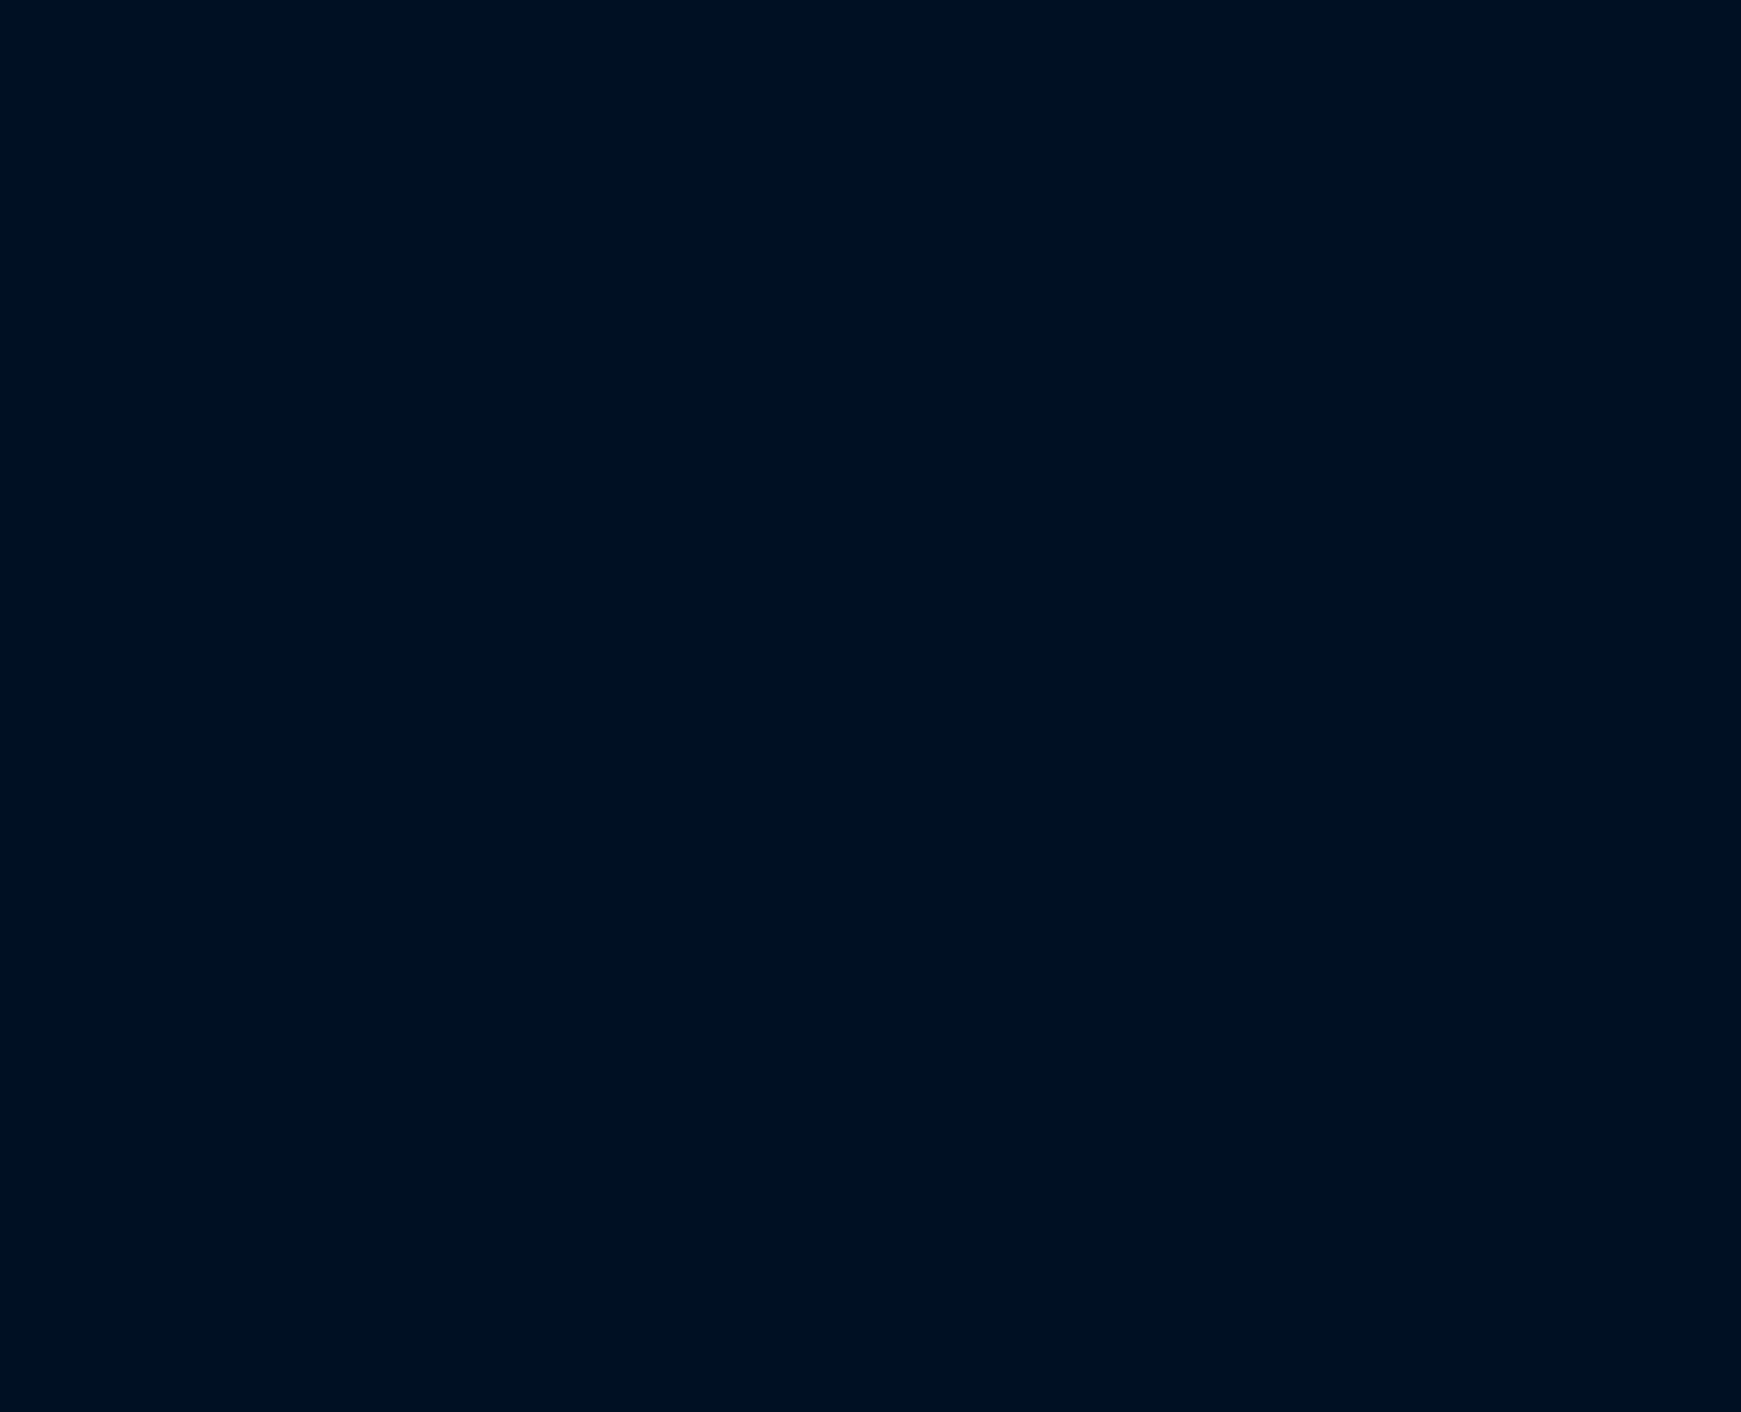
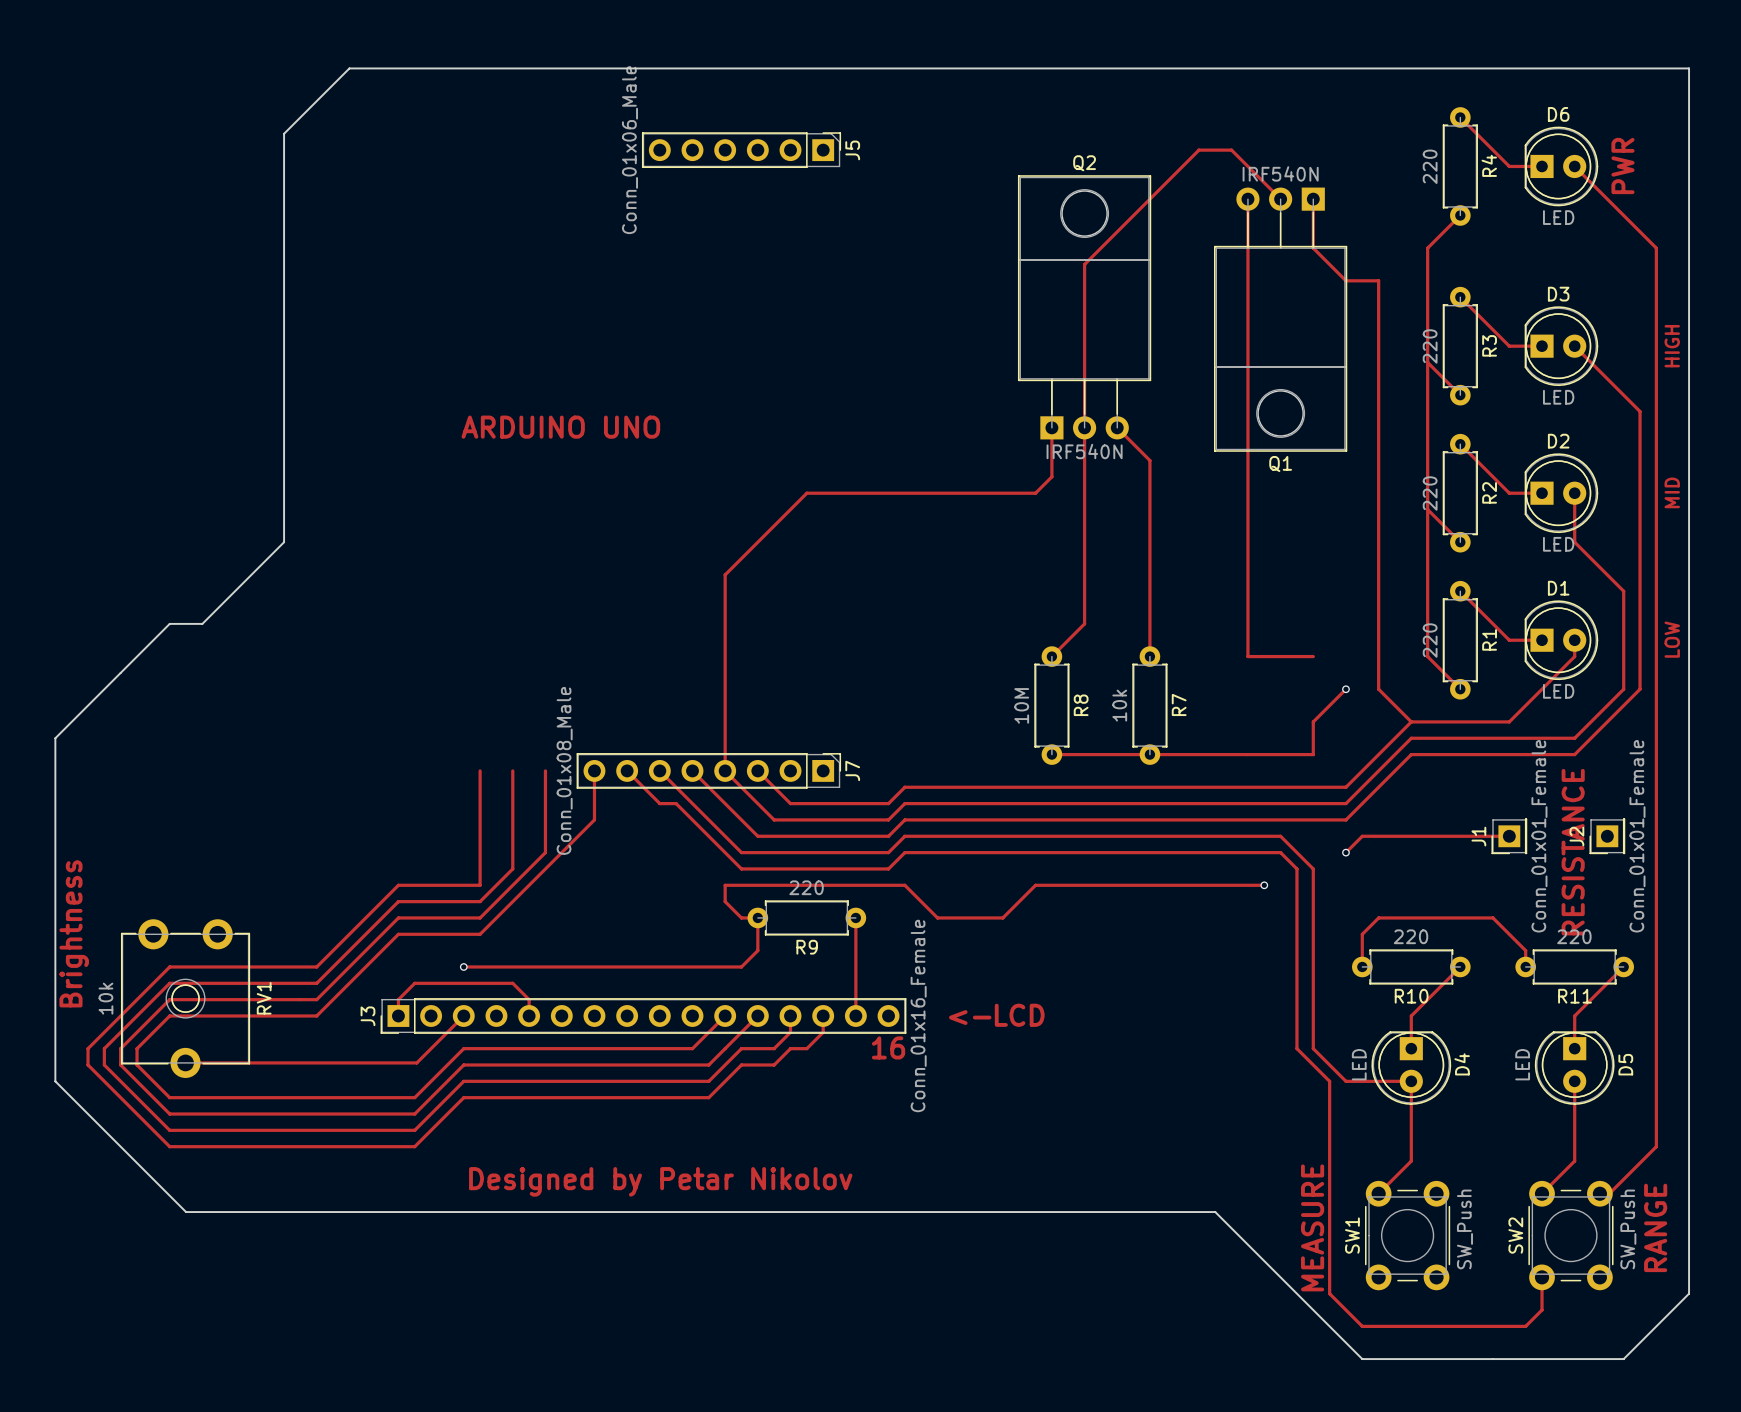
board edge: none -> (349, 68) (1689, 68) (1689, 1293) (1623, 1359) (1362, 1359) (1215, 1212) (186, 1212) (55, 1081) (55, 738) (169, 623) (202, 623) (284, 542) (284, 133) (349, 68)
track: none -> (1460, 117) (1509, 166) (1542, 166)
J5: none -> Conn_01x06_Male (741, 150)
text: none -> PWR (1622, 166)
R4: none -> 220 (1460, 166)
D6: none -> LED (1561, 166)
track: none -> (1574, 166) (1656, 248) (1656, 1146) (1609, 1193) (1599, 1193)
track: none -> (1247, 199) (1247, 656) (1313, 656)
track: none -> (1280, 199) (1231, 150) (1198, 150) (1084, 264) (1084, 623) (1051, 656)
track: none -> (1313, 199) (1313, 248) (1345, 280) (1378, 280) (1378, 689) (1411, 721)
track: none -> (1460, 215) (1427, 248) (1427, 656) (1460, 689)
track: none -> (1460, 297) (1509, 346) (1542, 346)
Q2: none -> IRF540N (1084, 307)
Q1: none -> IRF540N (1280, 319)
R3: none -> 220 (1460, 346)
D3: none -> LED (1561, 346)
track: none -> (1574, 346) (1640, 411) (1640, 689) (1574, 754) (1411, 754) (1345, 819) (904, 819) (888, 836) (757, 836) (692, 770)
text: none -> HIGH (1672, 346)
track: none -> (1427, 362) (1460, 395)
text: none -> ARDUINO UNO (560, 427)
track: none -> (1051, 427) (1051, 476) (1035, 493) (806, 493) (725, 574) (725, 770) (774, 819) (888, 819) (904, 803) (1345, 803) (1411, 738) (1574, 738) (1623, 689) (1623, 591) (1574, 542) (1574, 493)
track: none -> (1117, 427) (1149, 460) (1149, 656)
track: none -> (1460, 444) (1509, 493) (1542, 493)
R2: none -> 220 (1460, 493)
D2: none -> LED (1561, 493)
text: none -> MID (1672, 492)
track: none -> (1427, 509) (1460, 542)
track: none -> (1460, 591) (1509, 640) (1542, 640)
text: none -> LOW (1672, 639)
R1: none -> 220 (1460, 640)
D1: none -> LED (1561, 640)
track: none -> (1574, 640) (1574, 656) (1509, 721) (1411, 721)
track: none -> (1345, 689) (1313, 721) (1313, 754) (1051, 754)
via: none -> (1345, 689)
R8: none -> 10M (1051, 705)
R7: none -> 10k (1149, 705)
track: none -> (1411, 721) (1345, 787) (904, 787) (888, 803) (790, 803) (757, 770)
track: none -> (480, 770) (480, 885) (398, 885) (316, 966) (169, 966) (88, 1048) (88, 1065) (169, 1146) (414, 1146) (463, 1097) (708, 1097) (741, 1065) (774, 1065) (790, 1048) (806, 1048) (823, 1032) (823, 1015)
track: none -> (512, 770) (512, 868) (480, 901) (398, 901) (316, 983) (169, 983) (104, 1048) (104, 1065) (169, 1130) (414, 1130) (463, 1081) (708, 1081) (741, 1048) (774, 1048) (790, 1032) (790, 1015)
track: none -> (545, 770) (545, 852) (480, 917) (398, 917) (316, 999) (169, 999) (120, 1048) (120, 1065) (169, 1114) (414, 1114) (463, 1065) (708, 1065) (757, 1015)
track: none -> (594, 770) (594, 819) (480, 934) (398, 934) (316, 1015) (169, 1015) (137, 1048) (137, 1065) (169, 1097) (414, 1097) (463, 1048) (692, 1048) (725, 1015)
track: none -> (627, 770) (659, 803) (676, 803) (741, 868) (888, 868) (904, 852) (1280, 852) (1296, 868) (1296, 1048) (1329, 1081) (1329, 1293) (1362, 1326) (1525, 1326) (1542, 1310) (1542, 1277)
track: none -> (659, 770) (741, 852) (888, 852) (904, 836) (1280, 836) (1313, 868) (1313, 1048) (1345, 1081) (1411, 1081) (1411, 1161) (1378, 1193)
J7: none -> Conn_01x08_Male (708, 770)
track: none -> (1509, 836) (1362, 836) (1345, 852)
J1: none -> Conn_01x01_Female (1509, 836)
J2: none -> Conn_01x01_Female (1607, 836)
via: none -> (1345, 852)
text: none -> RESISTANCE (1573, 852)
track: none -> (1264, 885) (1035, 885) (1002, 917) (937, 917) (904, 885) (725, 885) (725, 901) (741, 917) (757, 917) (757, 950) (741, 966) (463, 966)
via: none -> (1264, 885)
R9: none -> 220 (806, 917)
track: none -> (855, 917) (855, 1015)
text: none -> Brightness (74, 933)
via: none -> (463, 966)
track: none -> (1362, 966) (1362, 934) (1378, 917) (1493, 917) (1525, 950) (1525, 966)
R10: none -> 220 (1411, 966)
track: none -> (1460, 966) (1411, 1015) (1411, 1048)
R11: none -> 220 (1574, 966)
track: none -> (1623, 966) (1574, 1015) (1574, 1048)
RV1: none -> 10k (185, 998)
track: none -> (398, 1015) (398, 999) (414, 983) (512, 983) (529, 999) (529, 1015)
track: none -> (463, 1015) (416, 1062) (185, 1062)
J3: none -> Conn_01x16_Female (643, 1015)
text: none -> LCD (1019, 1015)
text: none -> <- (970, 1017)
text: none -> 16 (888, 1047)
D4: none -> LED (1411, 1068)
D5: none -> LED (1574, 1068)
track: none -> (1574, 1081) (1574, 1161) (1542, 1193)
text: none -> Designed by Petar Nikolov (660, 1181)
text: none -> MEASURE (1312, 1227)
text: none -> RANGE (1655, 1227)
SW1: none -> SW_Push (1407, 1235)
SW2: none -> SW_Push (1570, 1235)

